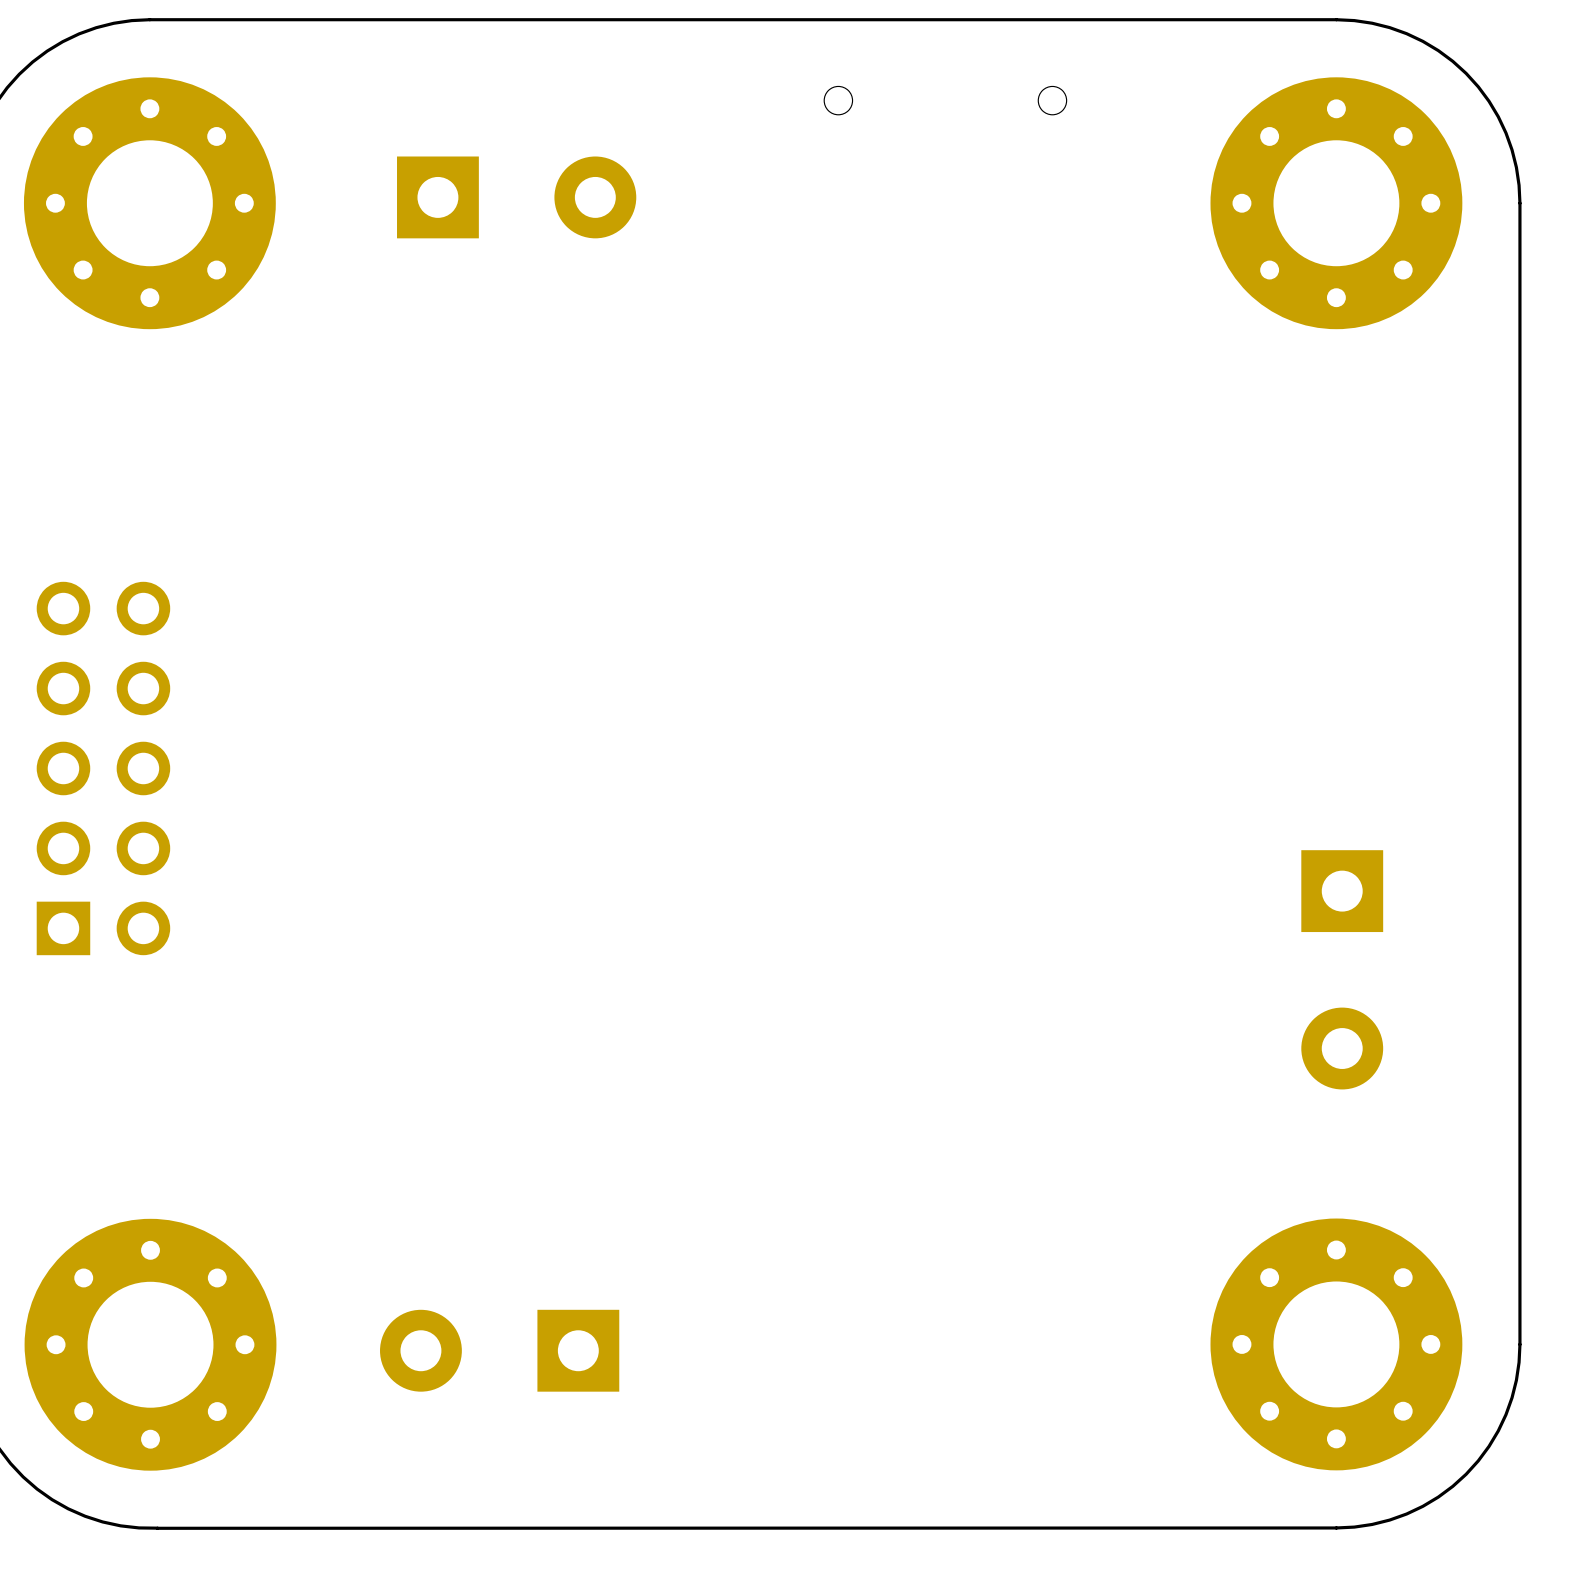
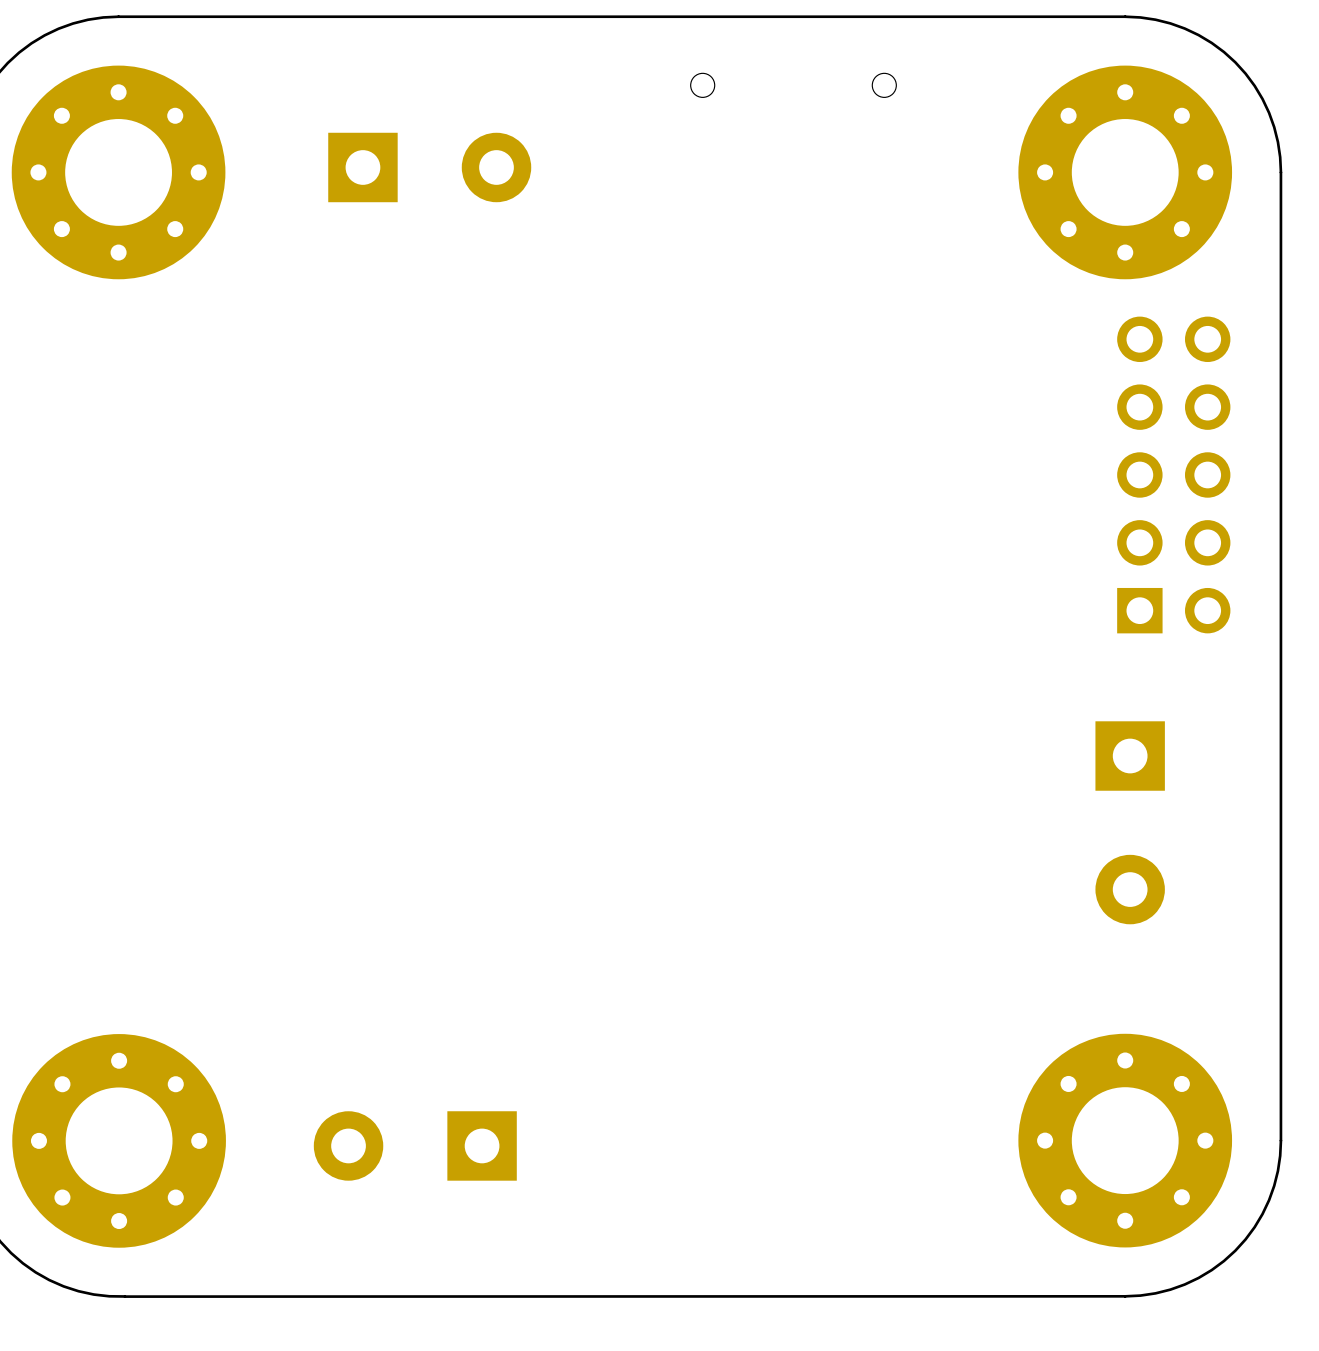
part: none -> (1173, 474)
part: (103, 768) -> none

